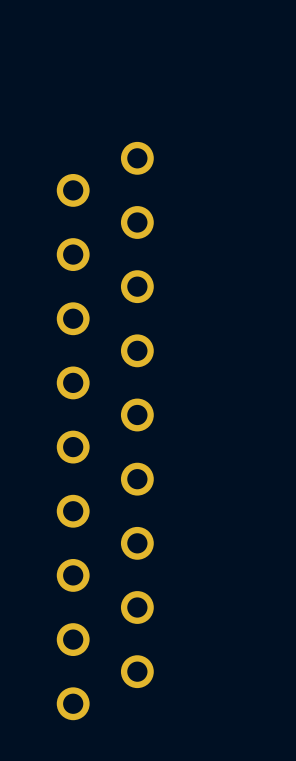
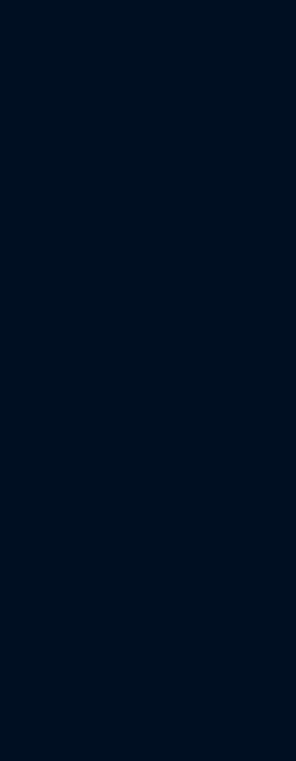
part: (105, 431) -> none

